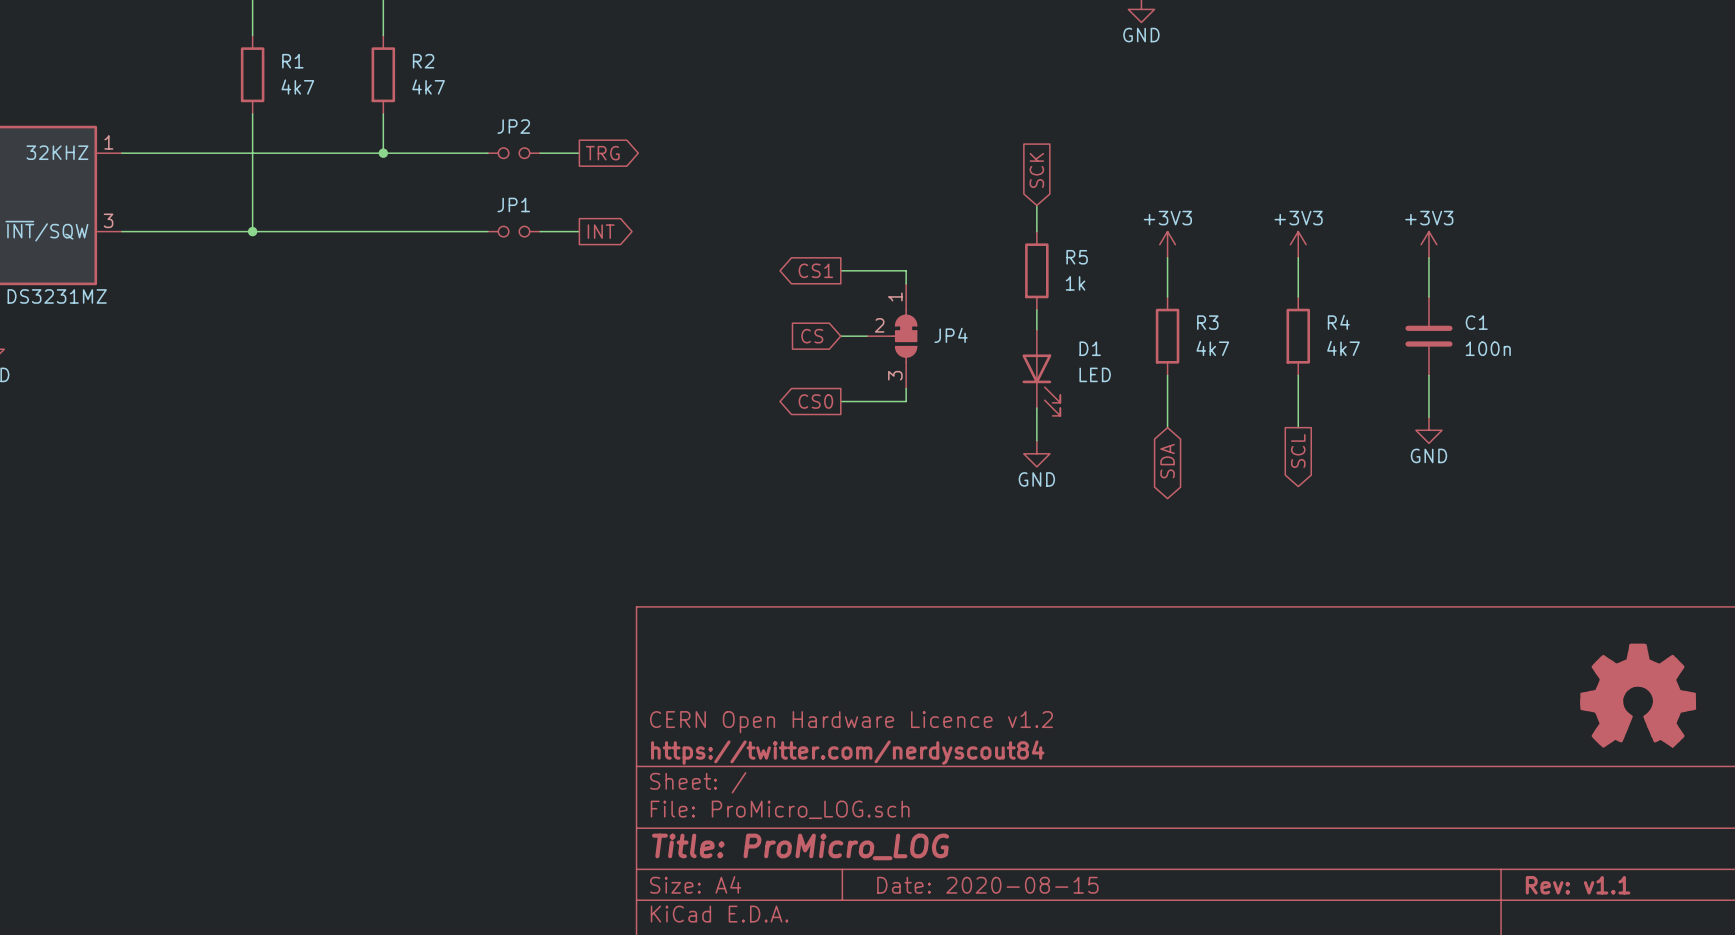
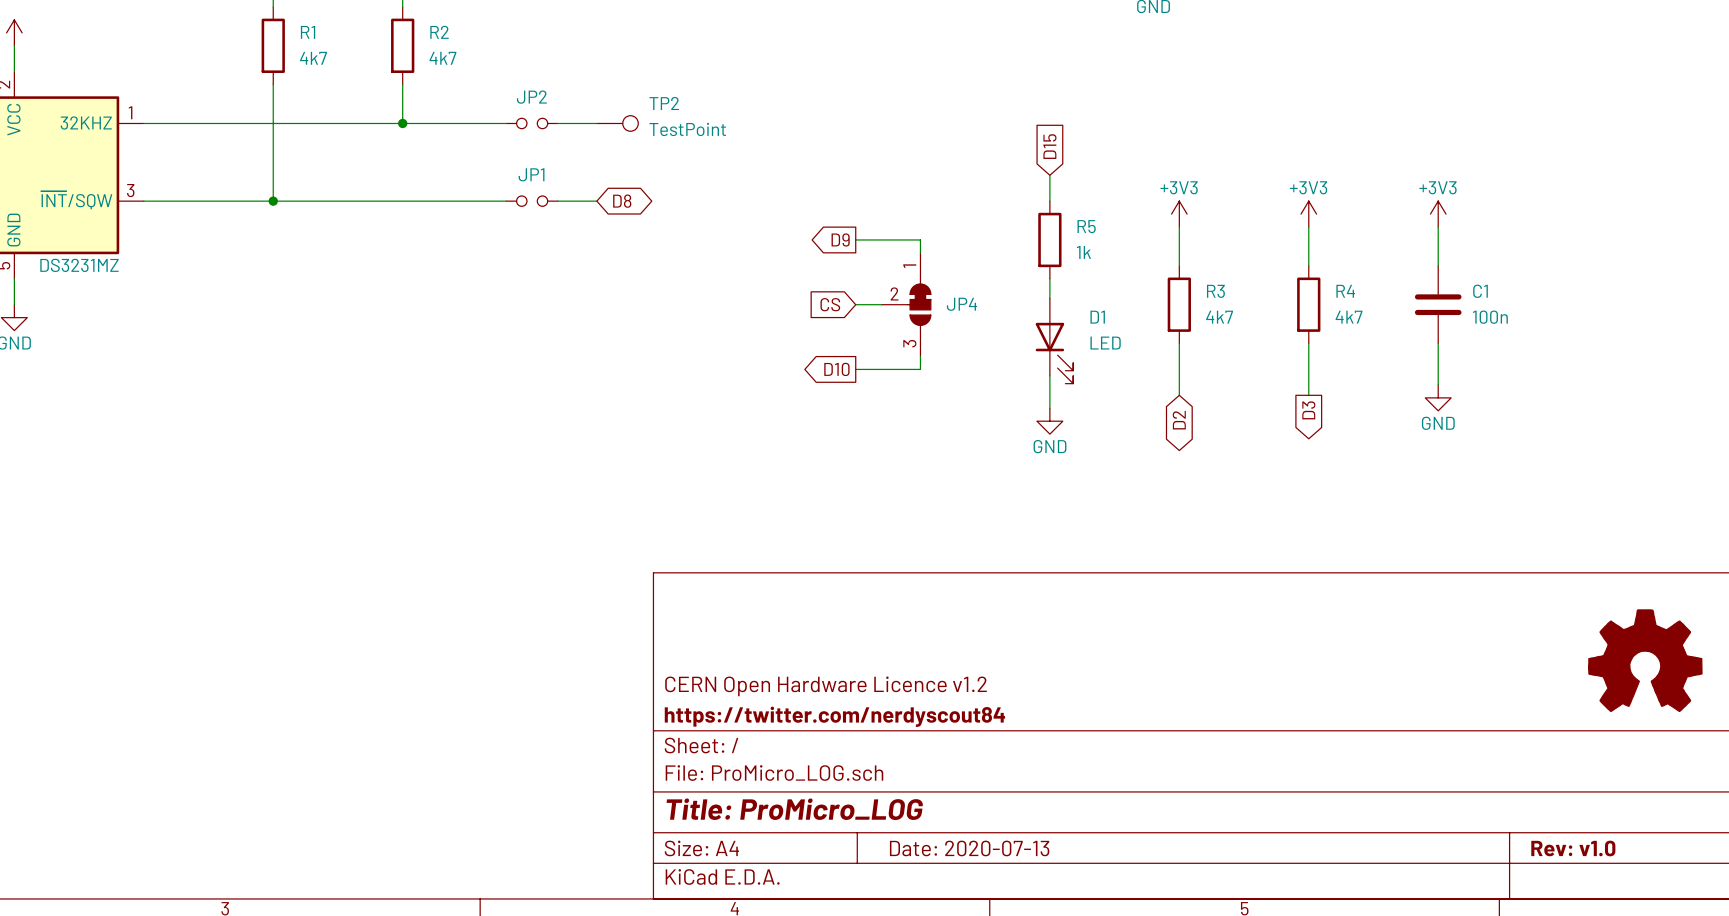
TP2: none -> TestPoint (617, 123)
global label: TRG (602, 153) -> none
global label: SCK (1036, 170) -> D15 (1049, 146)
global label shape: output (601, 231) -> bidirectional (622, 201)
global label: INT (601, 231) -> D8 (622, 201)
global label: CS1 (815, 270) -> D9 (840, 239)
global label: CS0 (815, 401) -> D10 (836, 369)
global label: SCL (1298, 451) -> D3 (1308, 410)
global label: SDA (1167, 461) -> D2 (1179, 420)
title block: Date: 2020-08-15 (987, 885) -> Date: 2020-07-13 (969, 848)
title block: Rev: v1.1 (1578, 885) -> Rev: v1.0 (1573, 848)

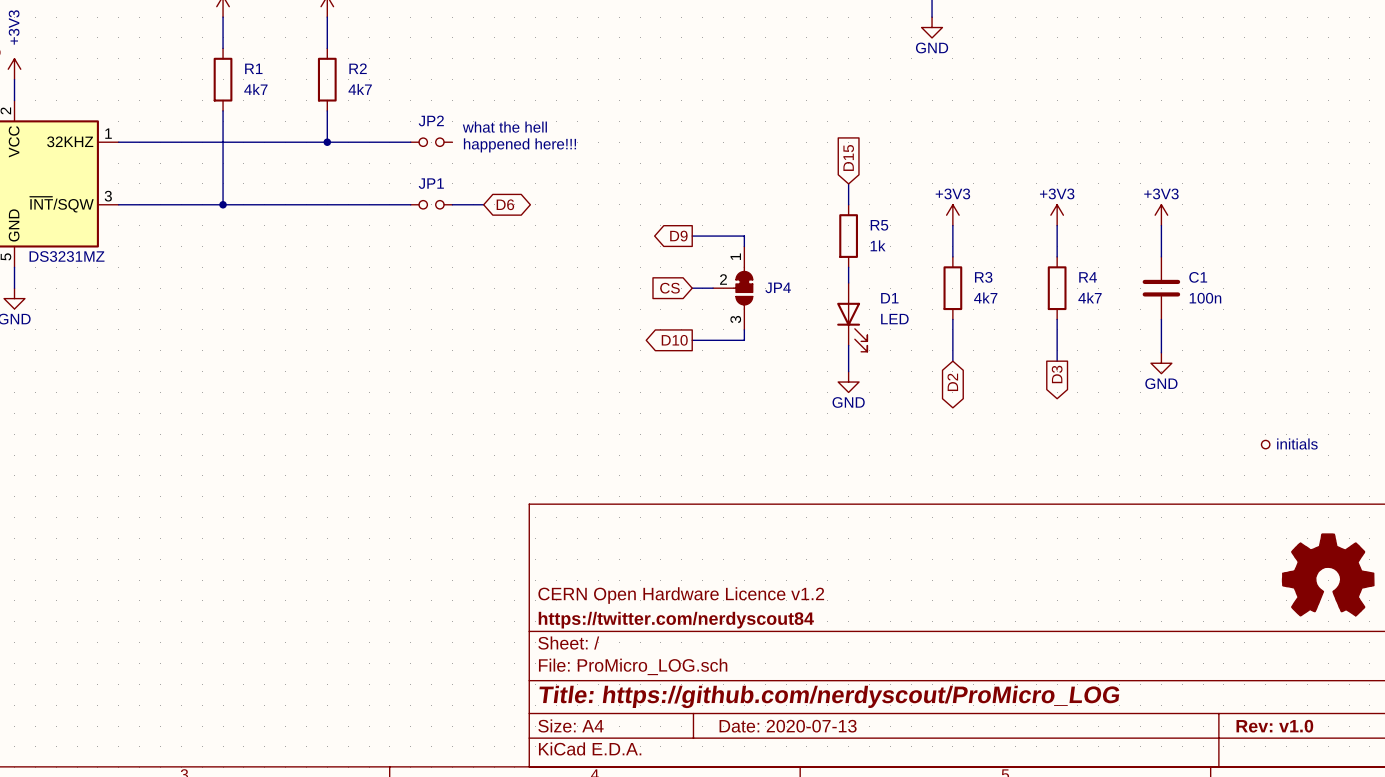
text: none -> what the hell (504, 127)
wire: (558, 123) (596, 123) -> none
TP2: TestPoint (617, 123) -> none
text: none -> happened here!!! (519, 145)
global label: D8 (622, 201) -> D6 (505, 204)
part: none -> initials (1265, 444)
title block: Title: ProMicro_LOG (794, 809) -> Title: https://github.com/nerdyscout/ProMicro_LOG (829, 696)

